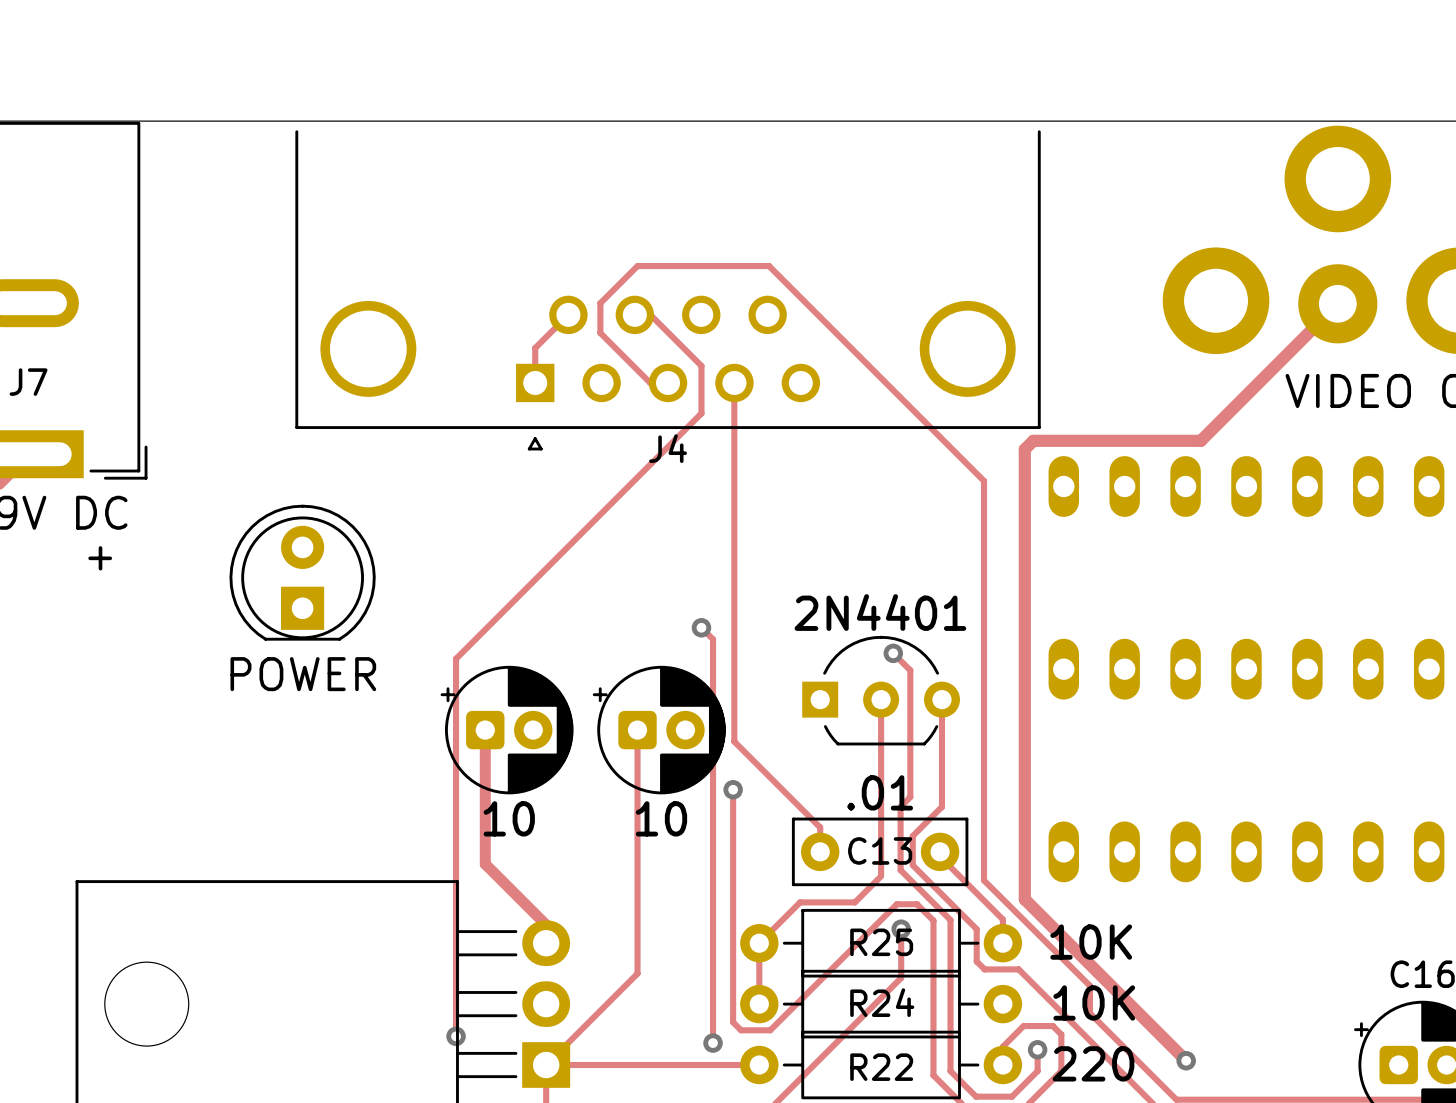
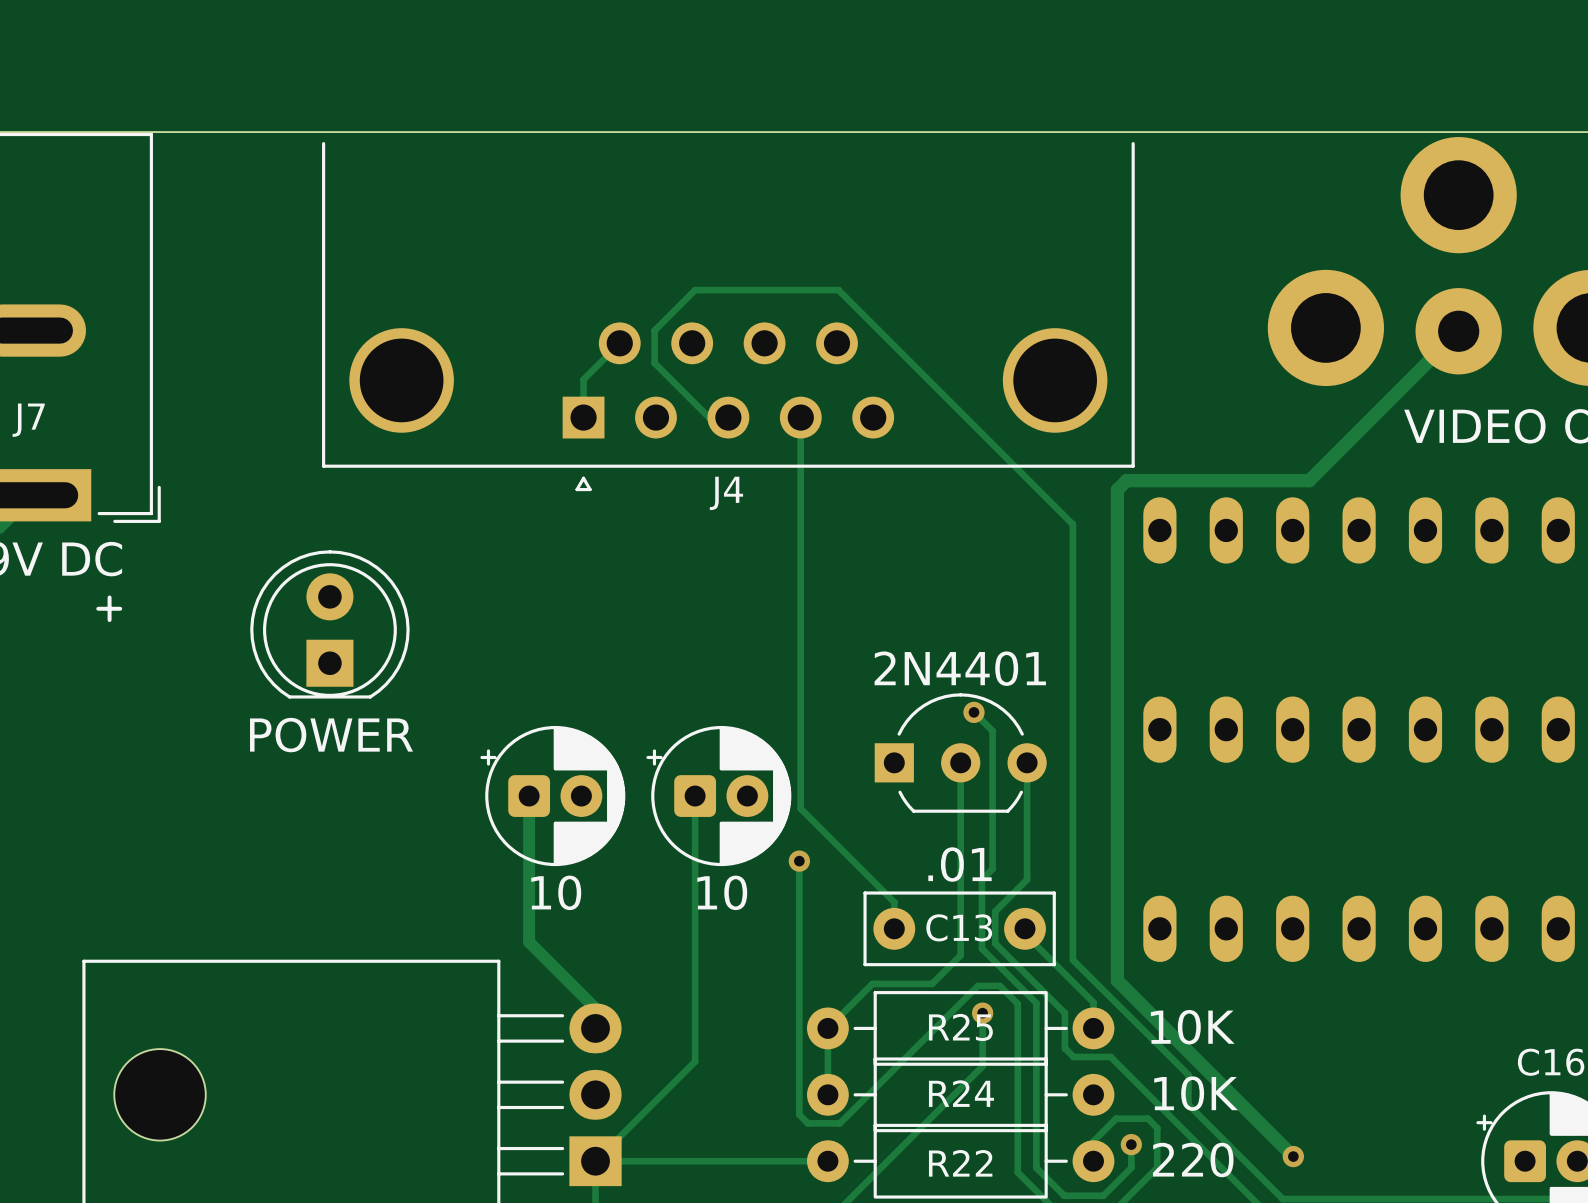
track: (635, 315) (650, 315) (701, 365) (701, 413) (456, 658) (456, 1036) -> none
track: (701, 627) (713, 639) (713, 1043) -> none
via: (701, 627) -> none
via: (456, 1036) -> none
via: (713, 1043) -> none

